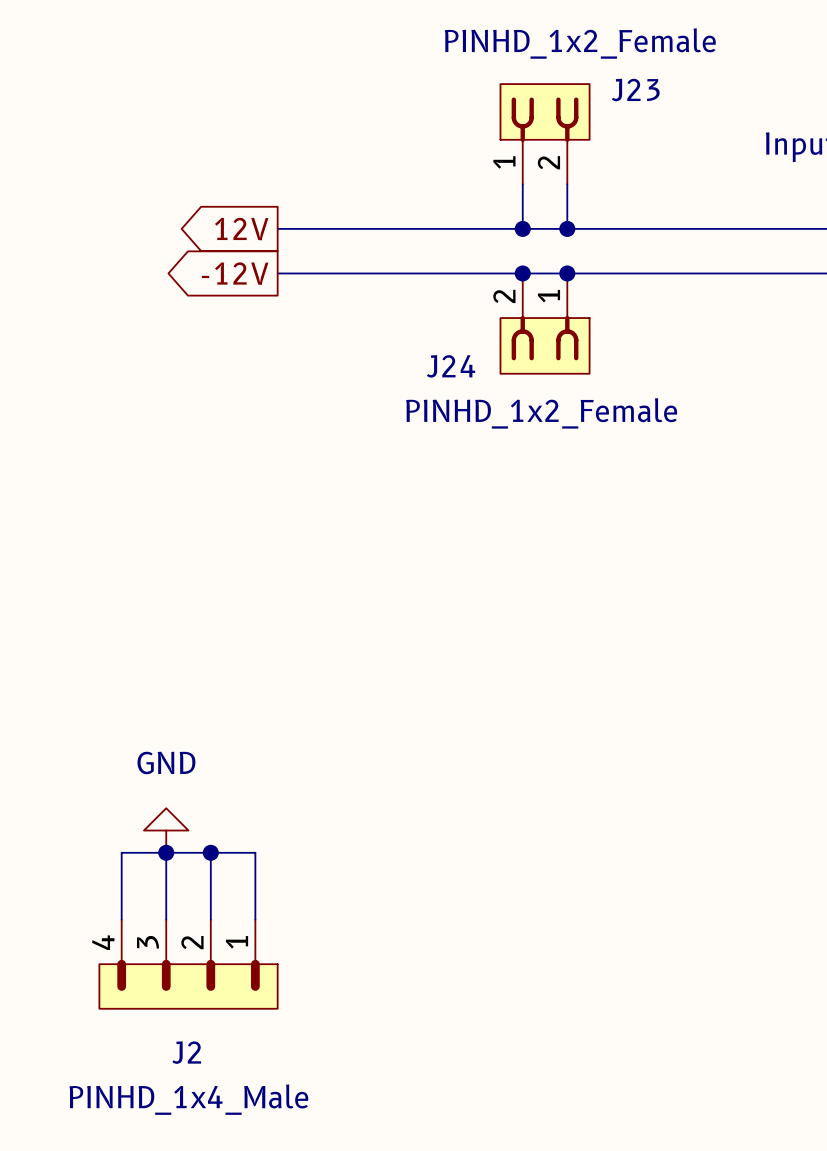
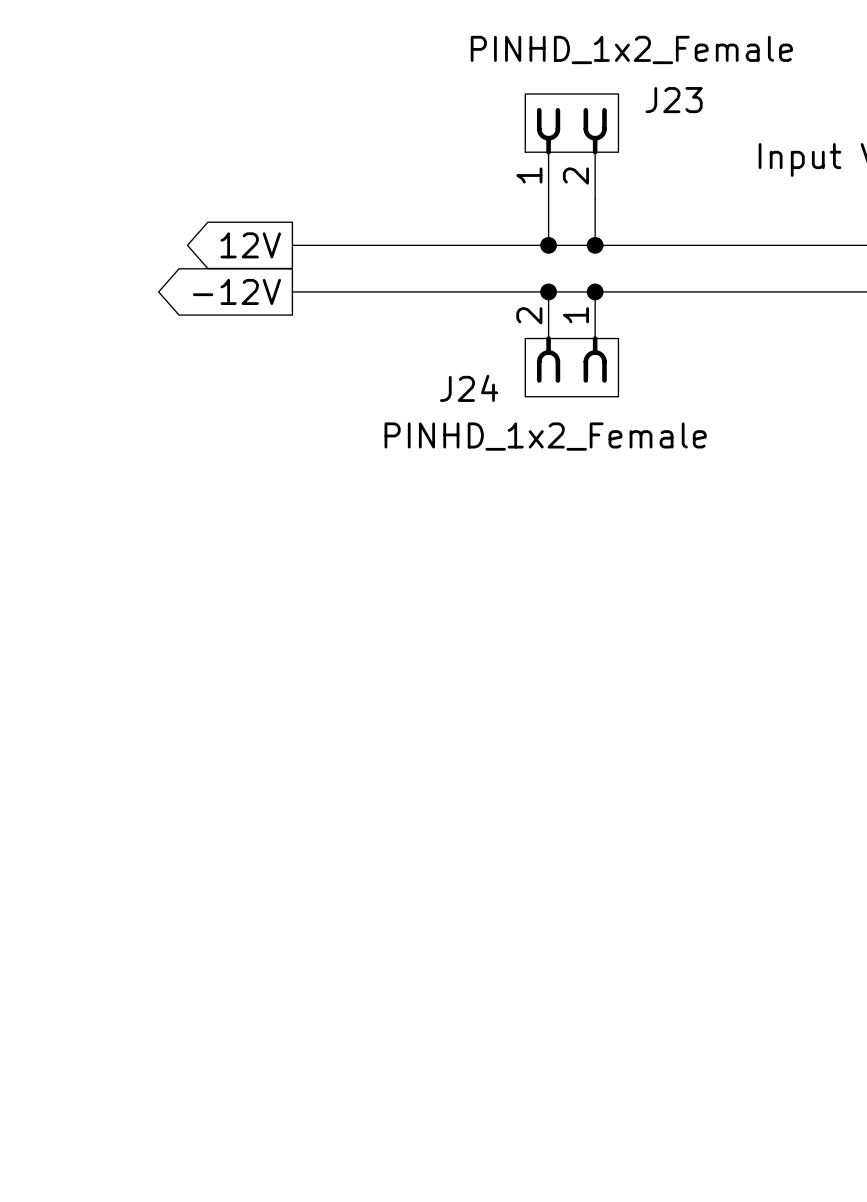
power symbol: GND (166, 830) -> none
wire: (166, 852) (166, 919) -> none
junction: (166, 852) -> none
wire: (210, 852) (210, 919) -> none
junction: (210, 852) -> none
wire: (121, 919) (121, 852) (255, 852) (255, 919) -> none
J2: PINHD_1x4_Male (188, 964) -> none

